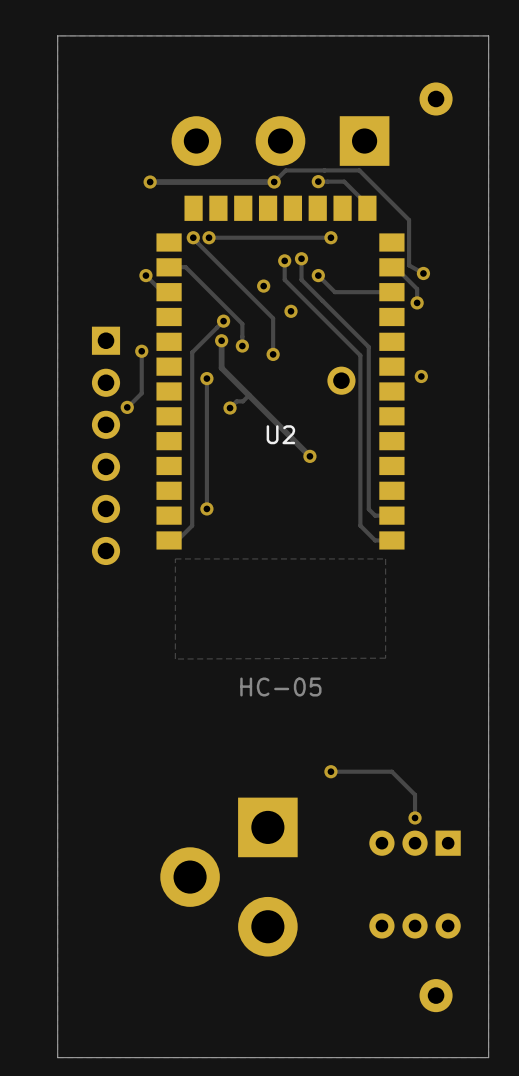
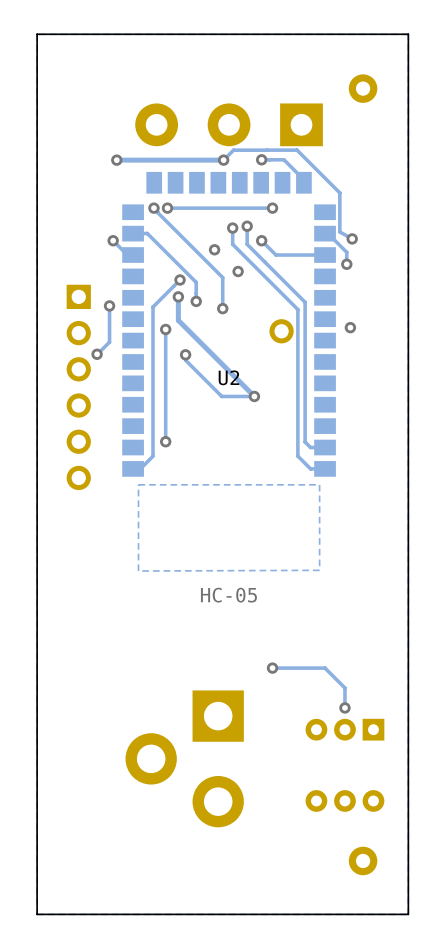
track: (248, 395) (242, 401) (236, 401) (230, 408) -> none
track: none -> (185, 360) (221, 396) (254, 396)

